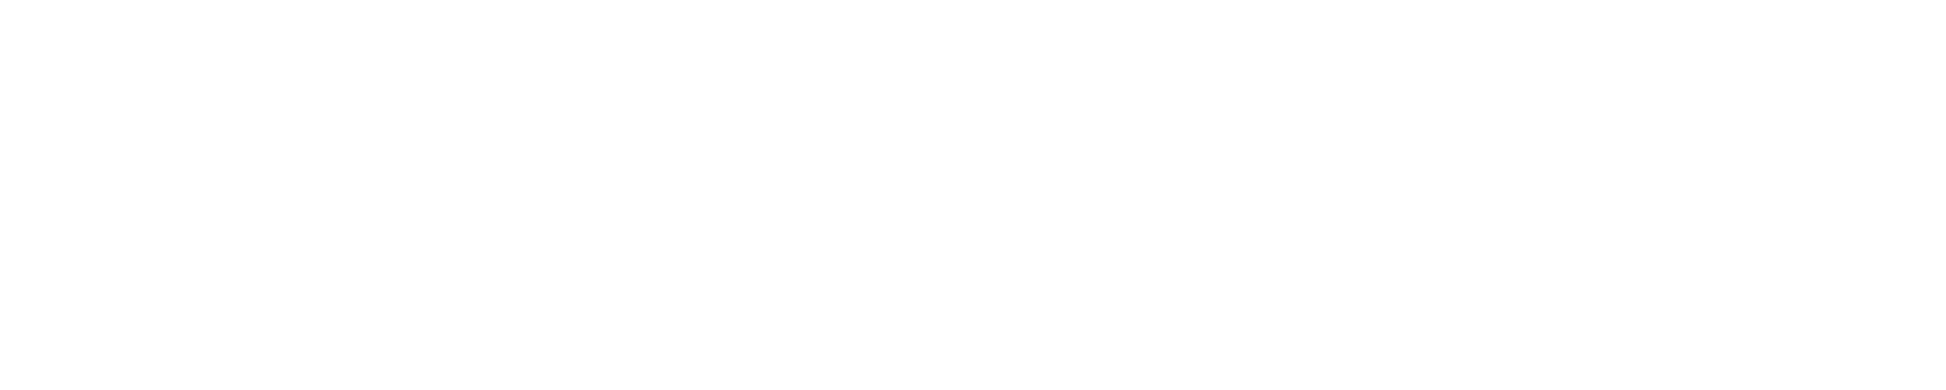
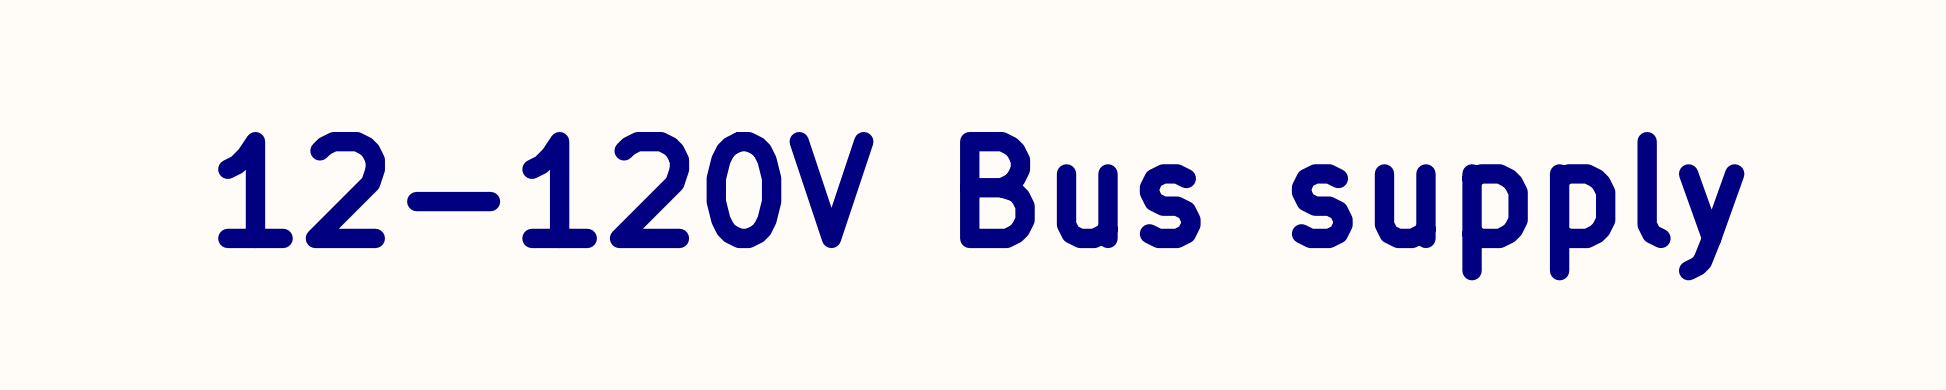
text: none -> 12-120V Bus supply (981, 206)

